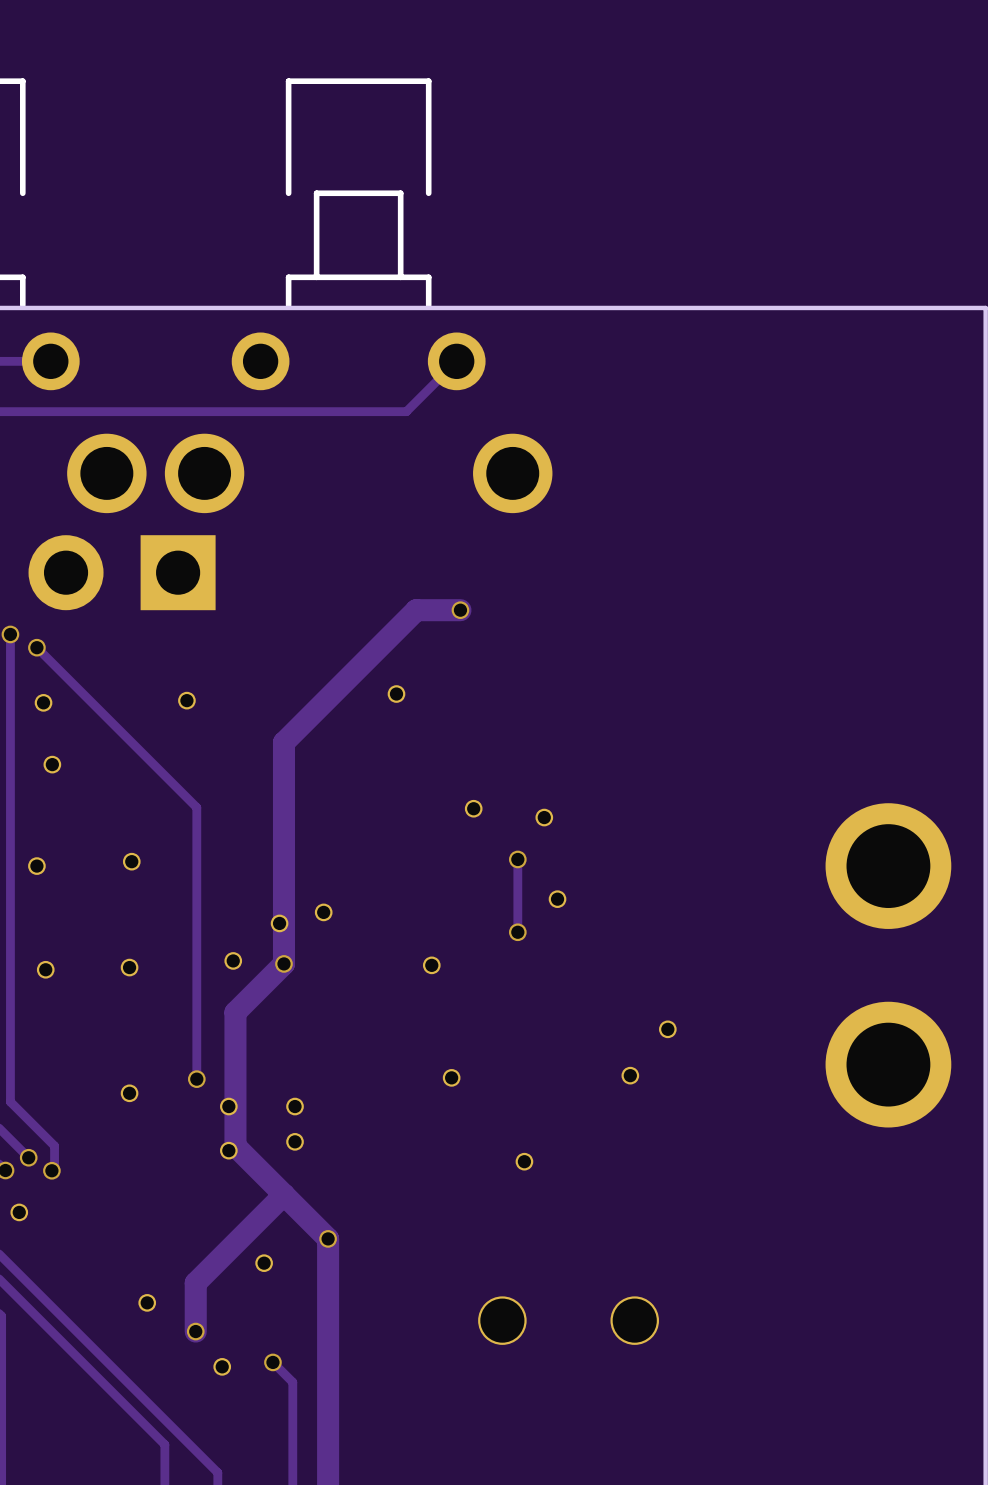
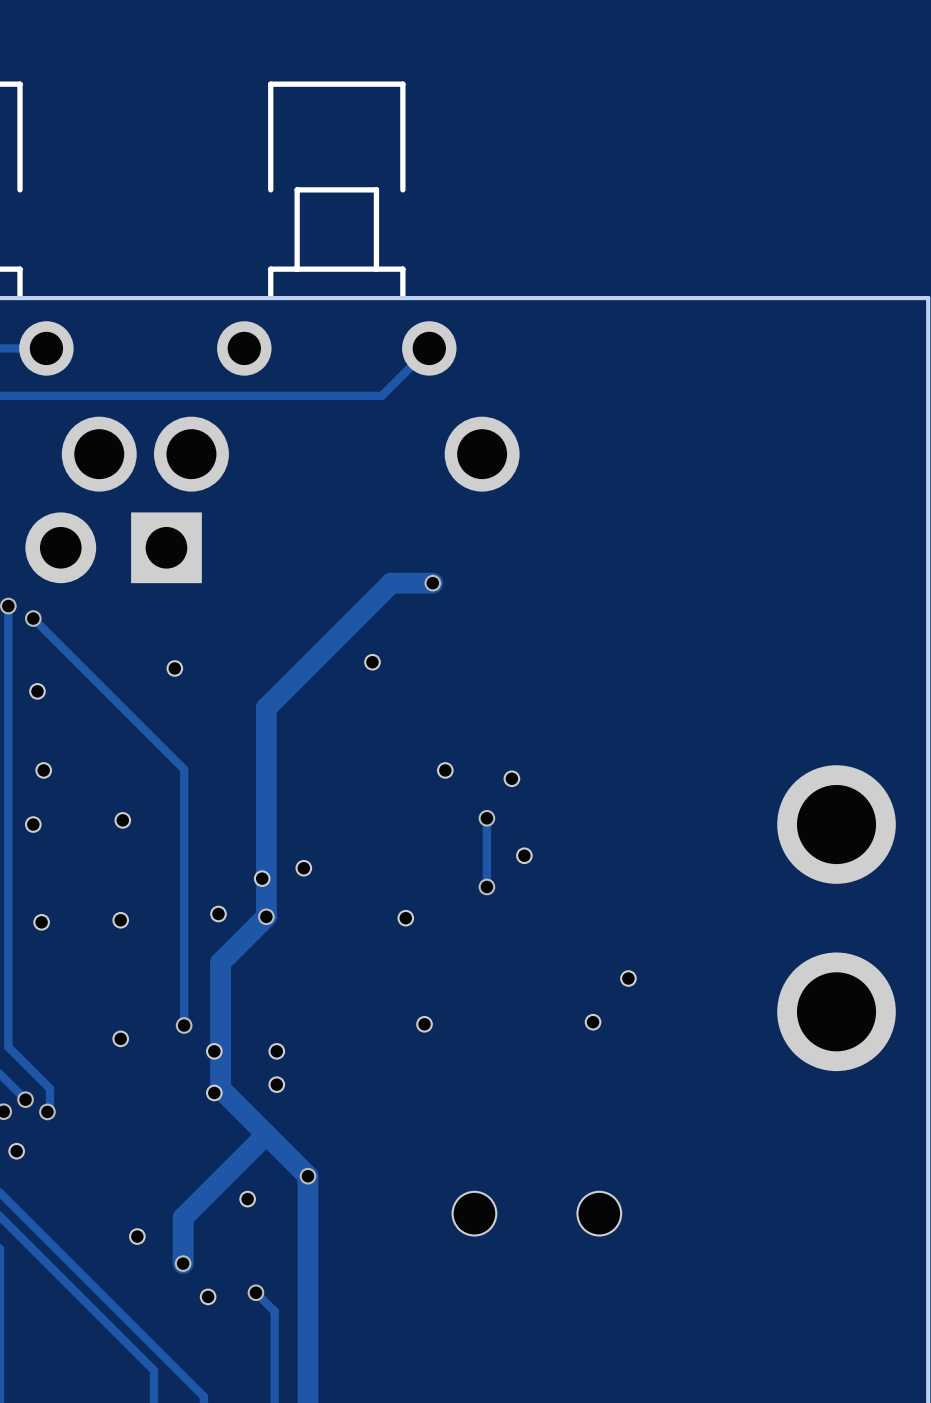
part: (43, 702) -> none
part: none -> (37, 691)
part: (52, 764) -> none
part: none -> (43, 770)
part: (524, 1161) -> none
part position: (568, 1320) -> (536, 1213)

